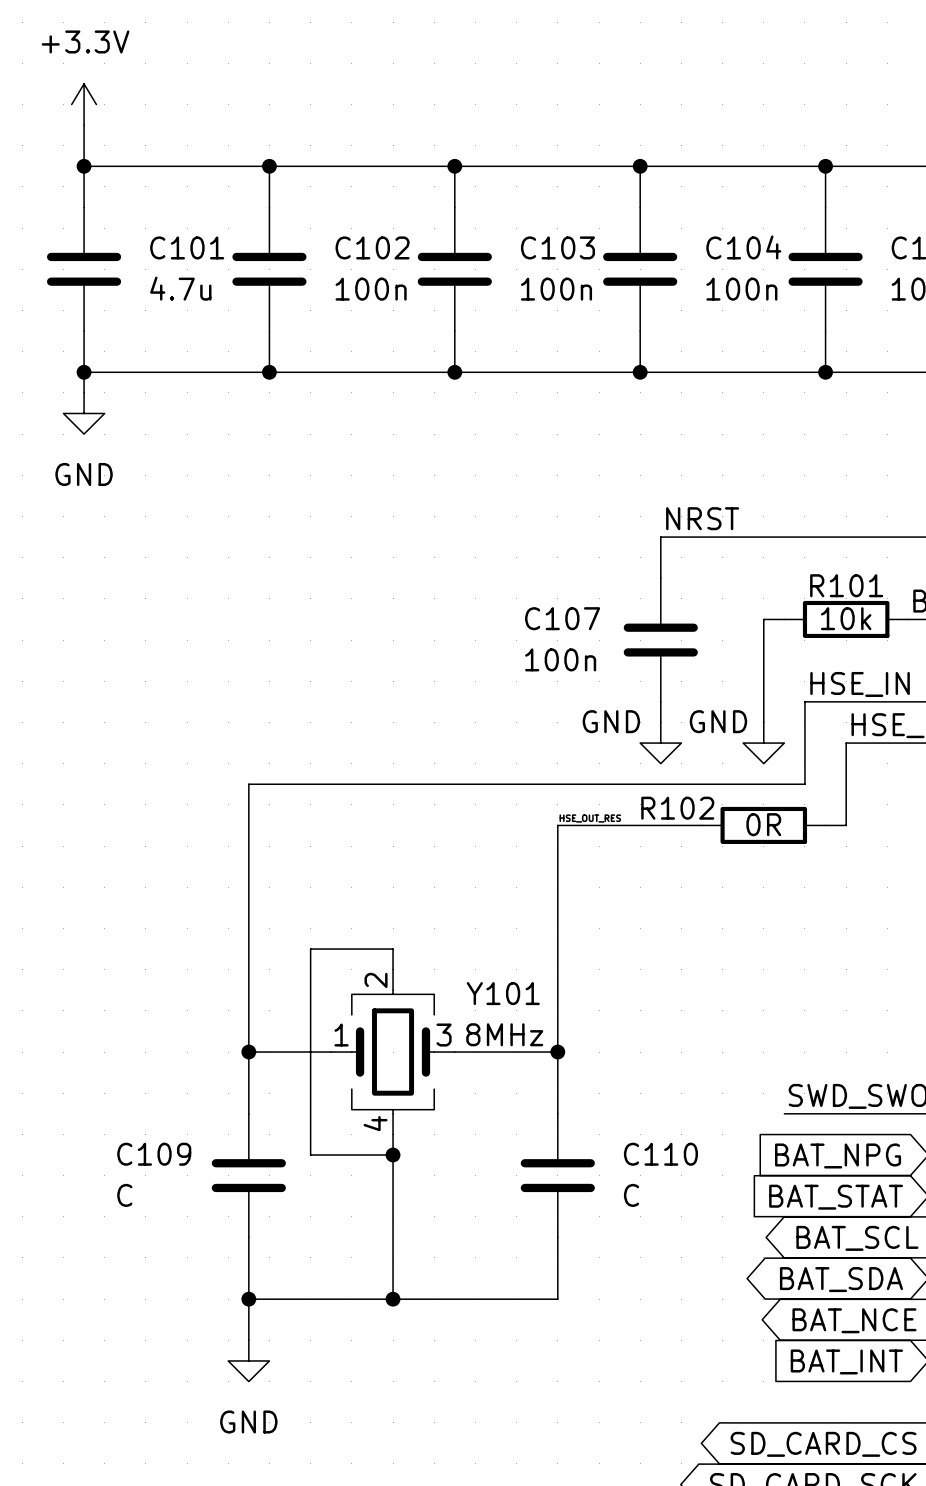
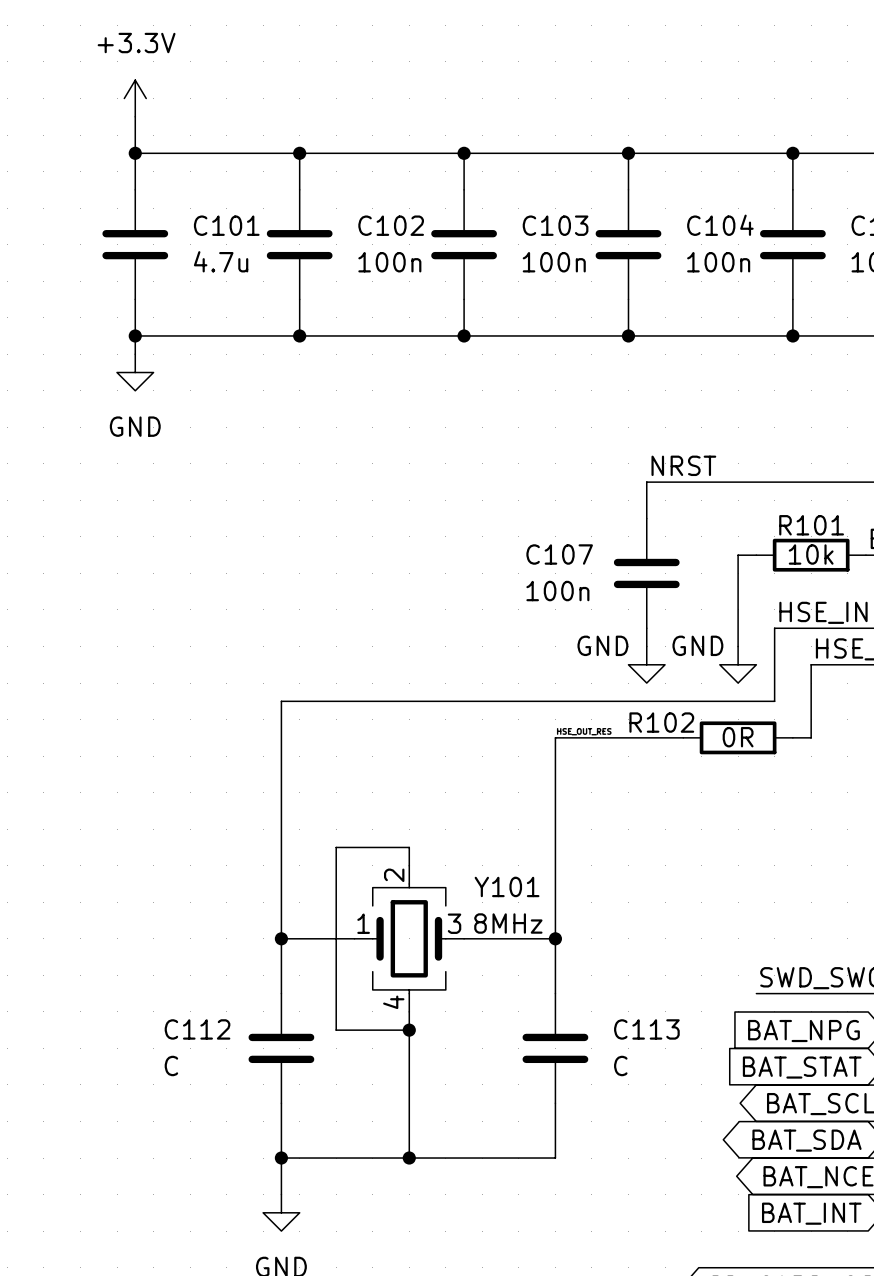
C109 name: C109 (154, 1154) -> C112 (197, 1029)
C110 name: C110 (660, 1154) -> C113 (646, 1029)

